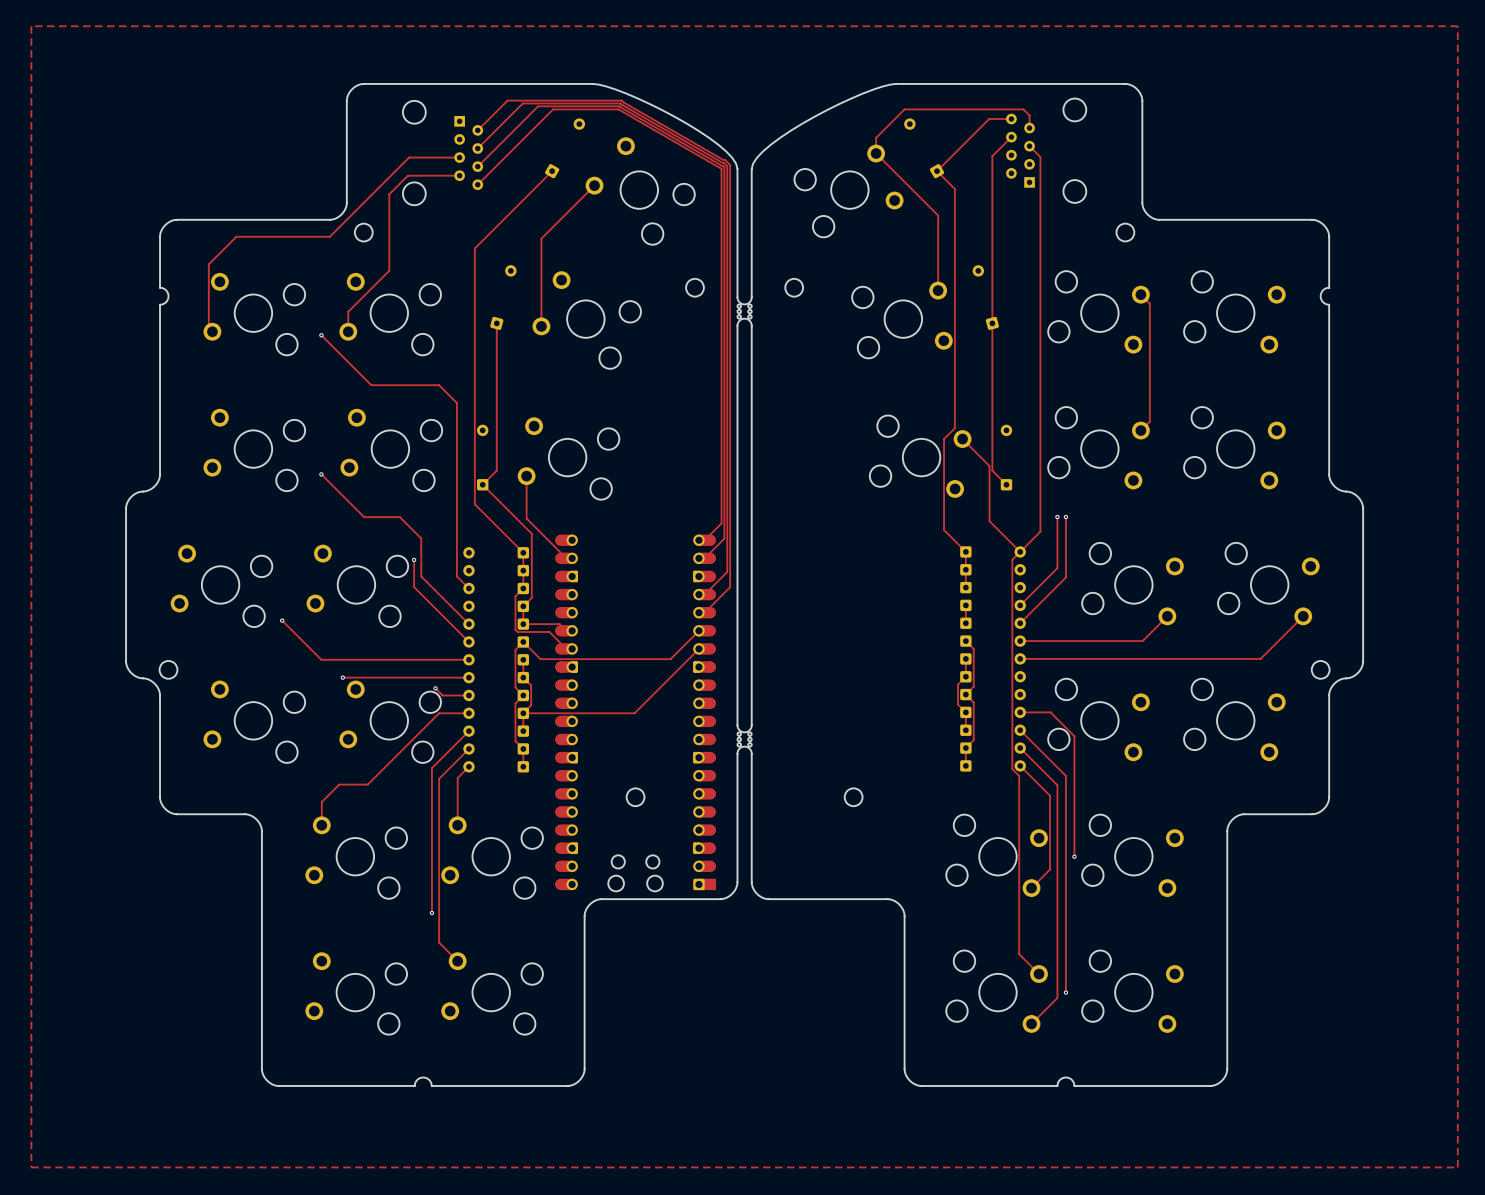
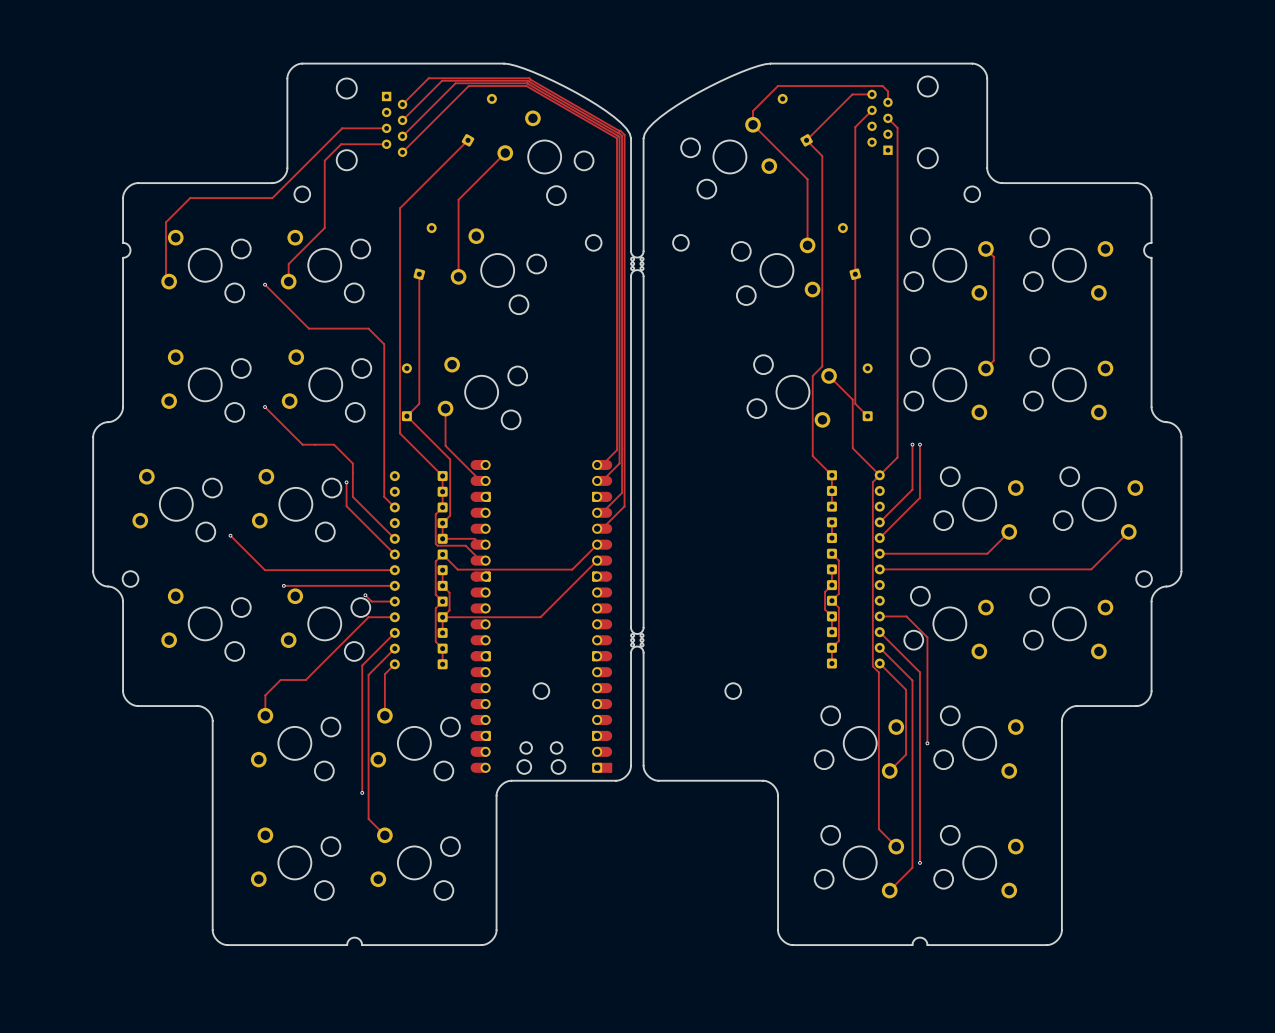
zone outline: (31, 26) (31, 1167) (1457, 1167) (1457, 26) (31, 26) -> none

